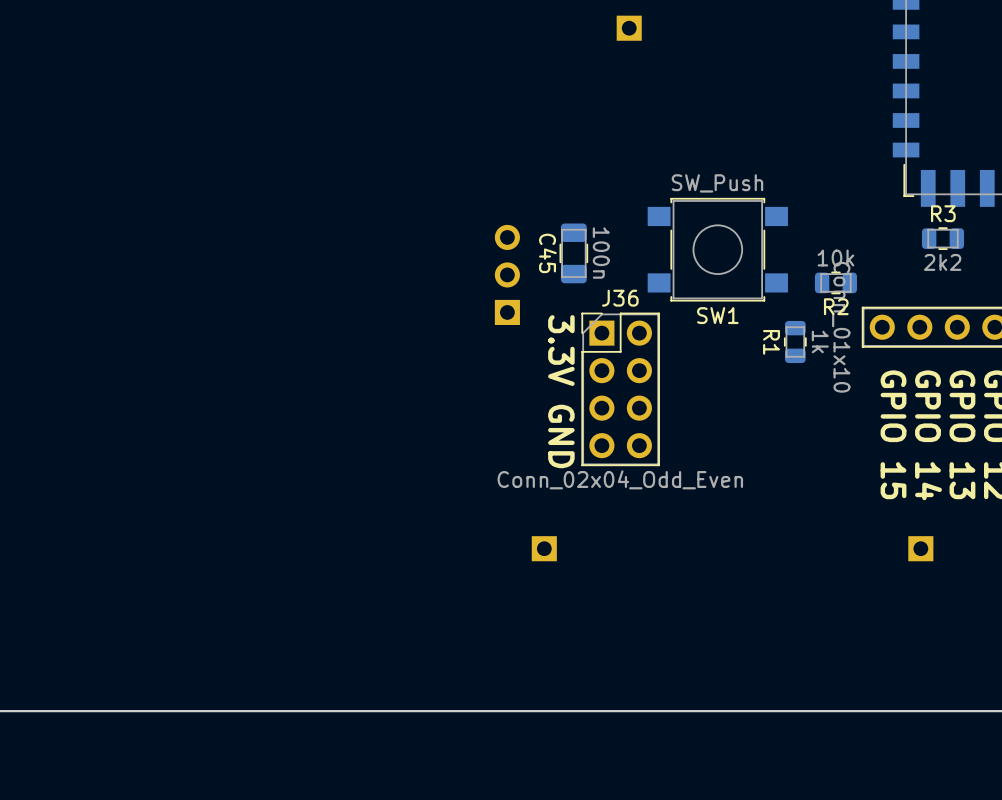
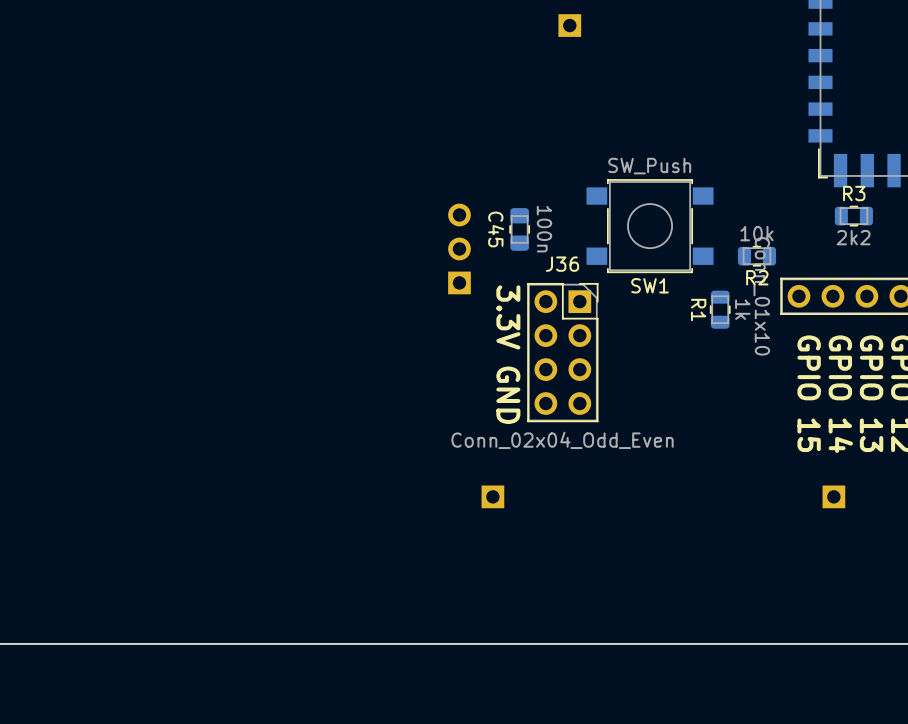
C45 footprint: [559, 223, 589, 284] -> [509, 208, 530, 251]
J36 footprint: [581, 312, 660, 467] -> [527, 283, 599, 423]

